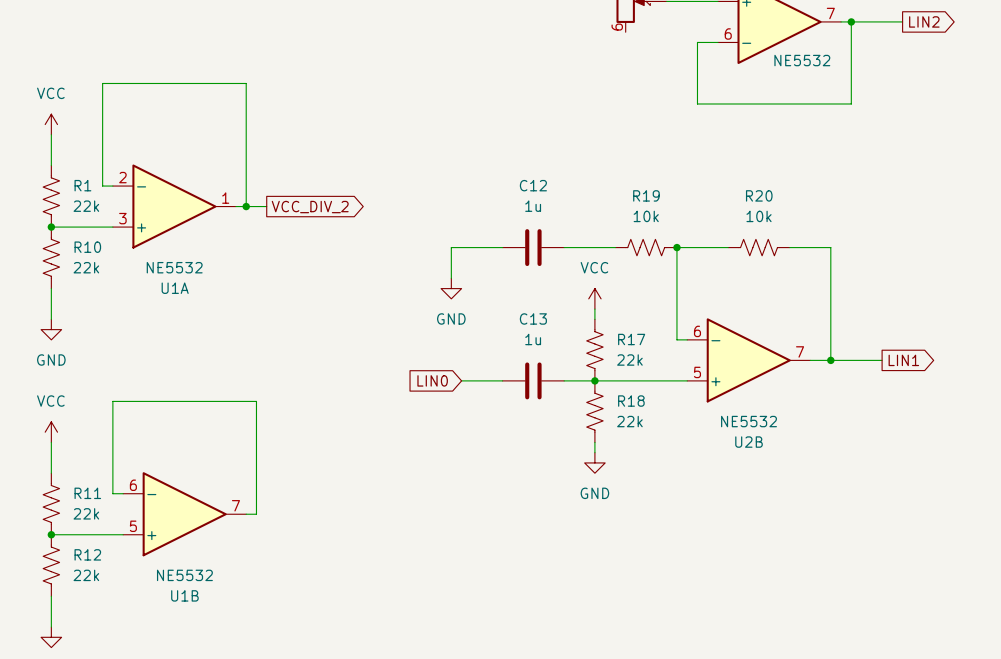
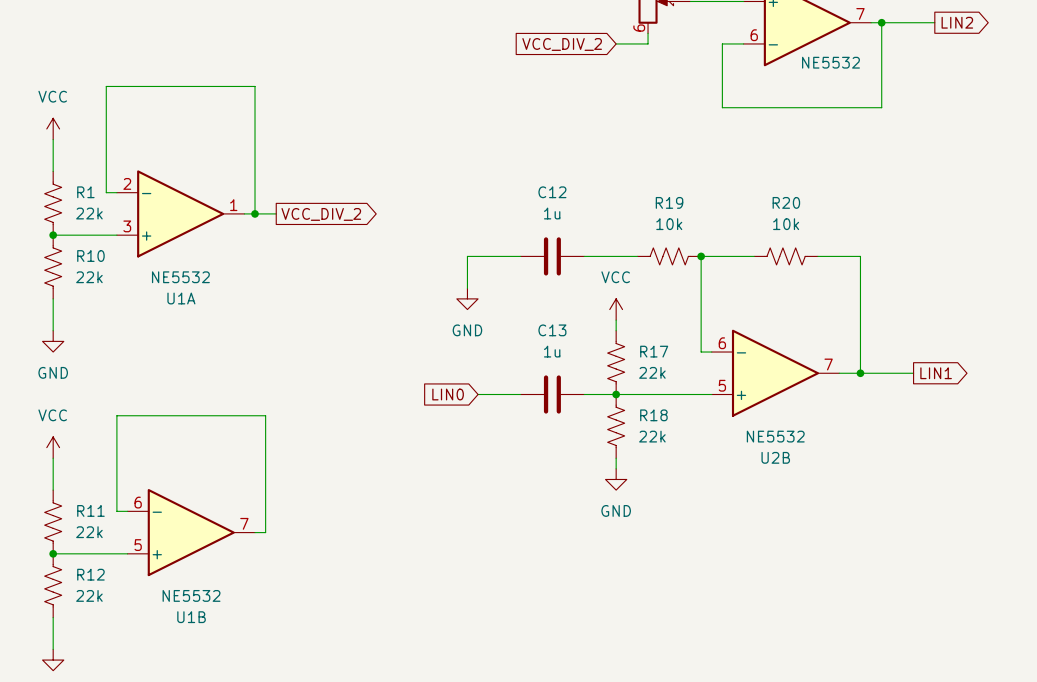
wire: none -> (648, 33) (648, 43) (616, 43)
global label: none -> VCC_DIV_2 (562, 44)

